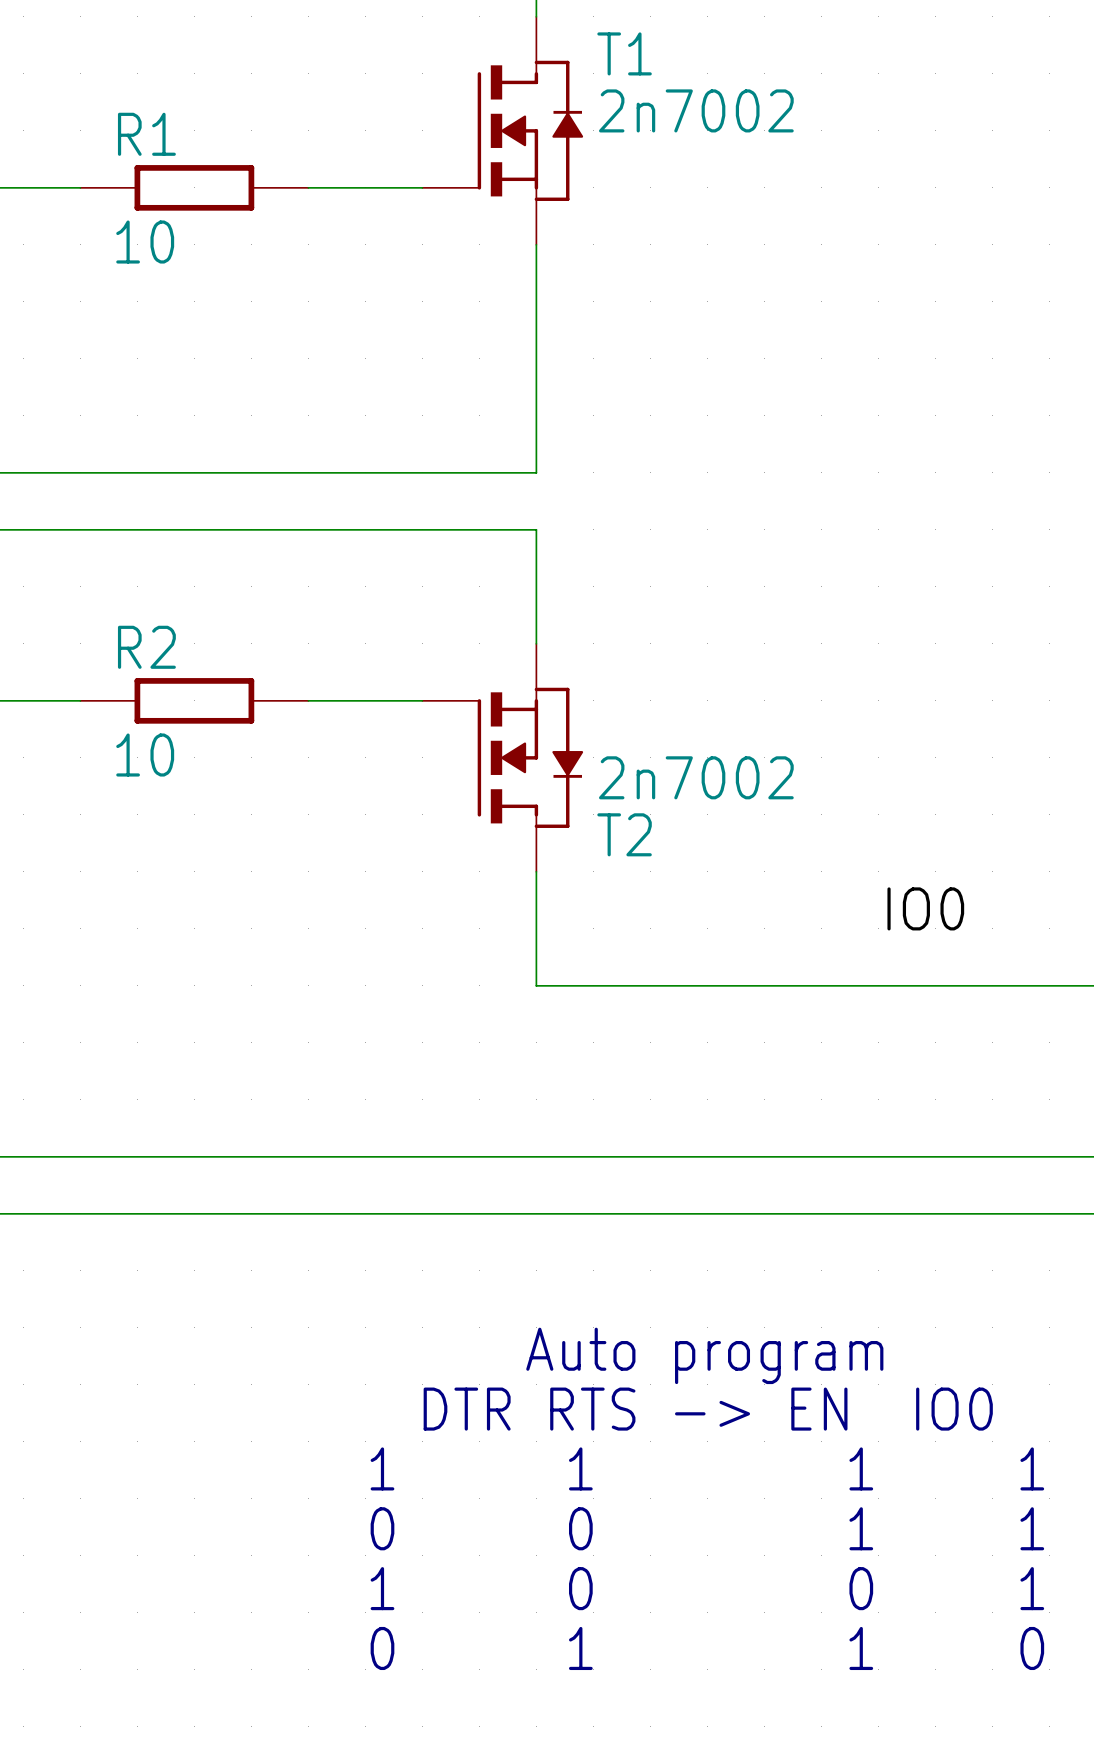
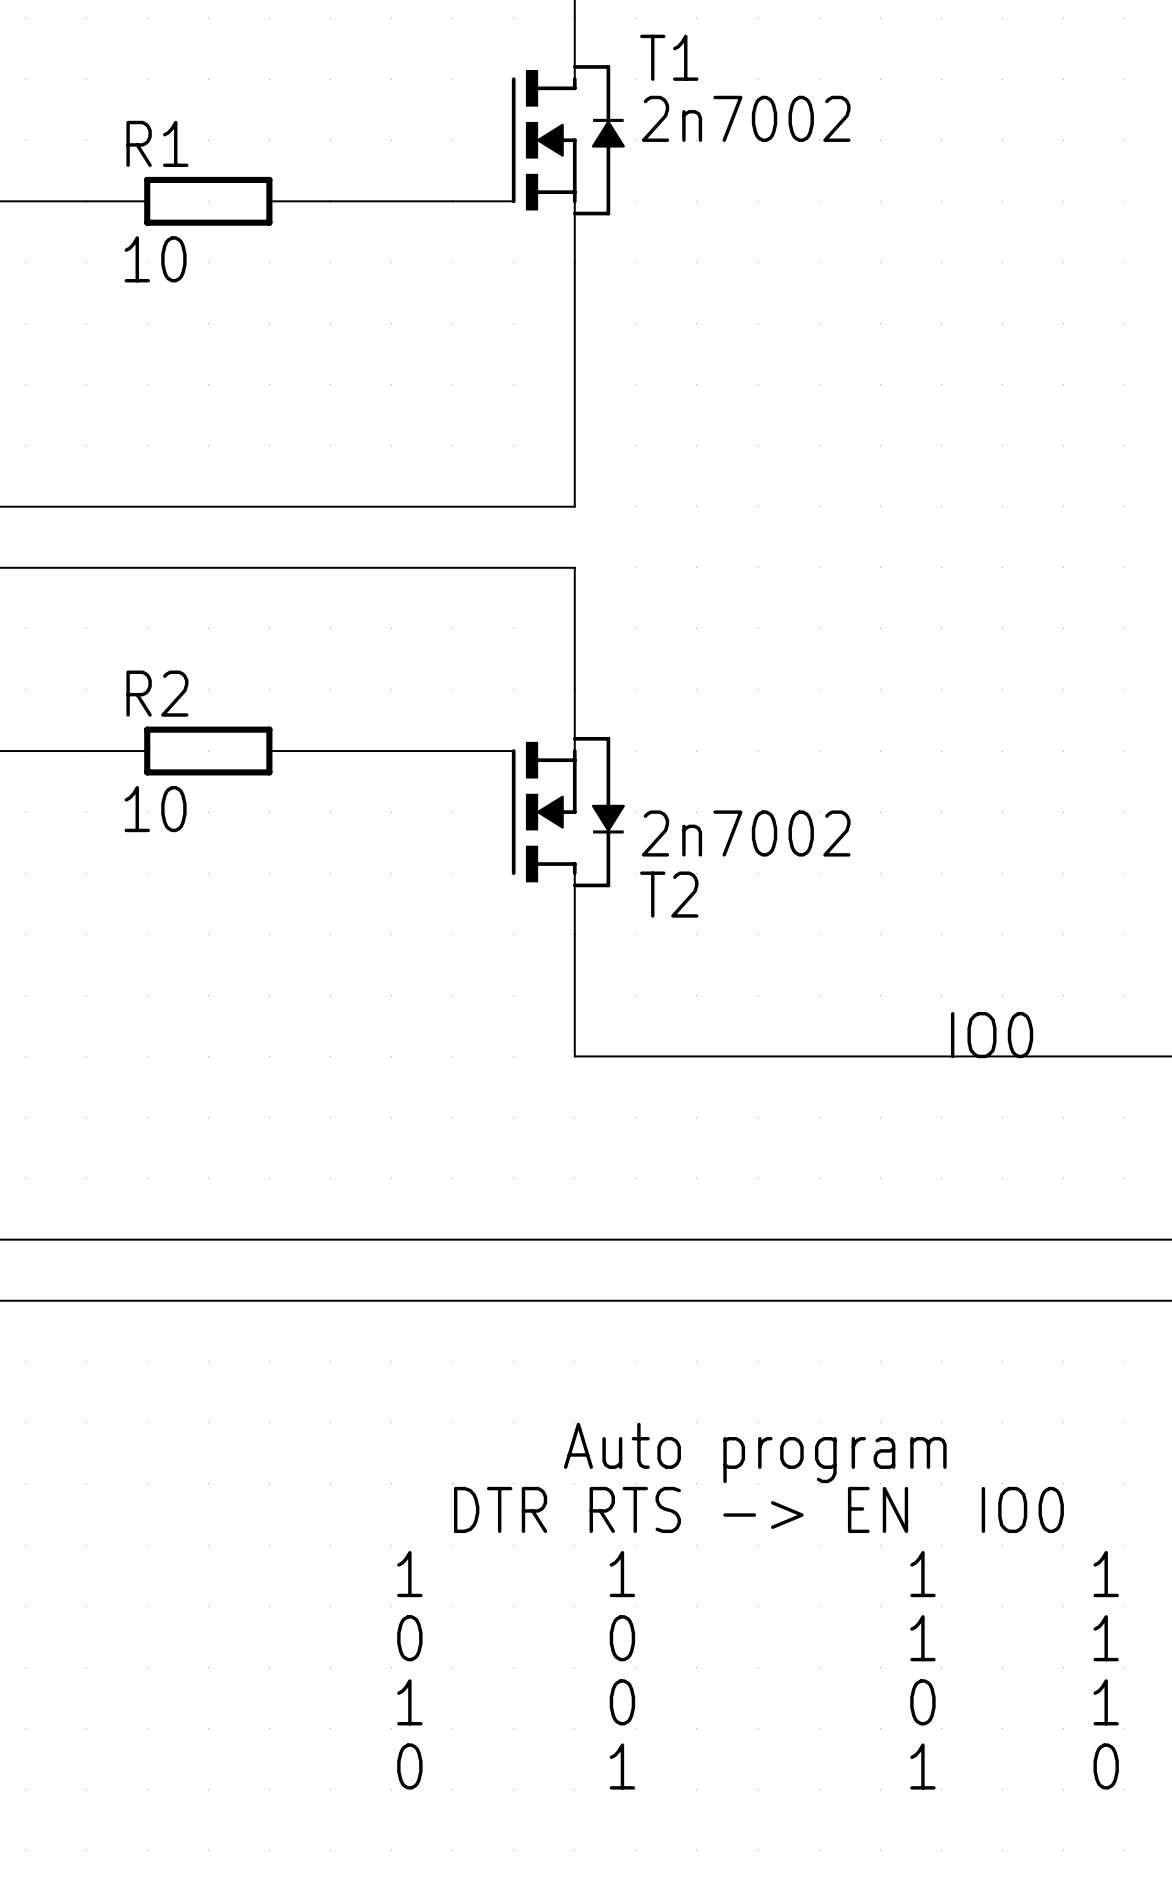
label position: IO0 (925, 908) -> IO0 (992, 1035)

